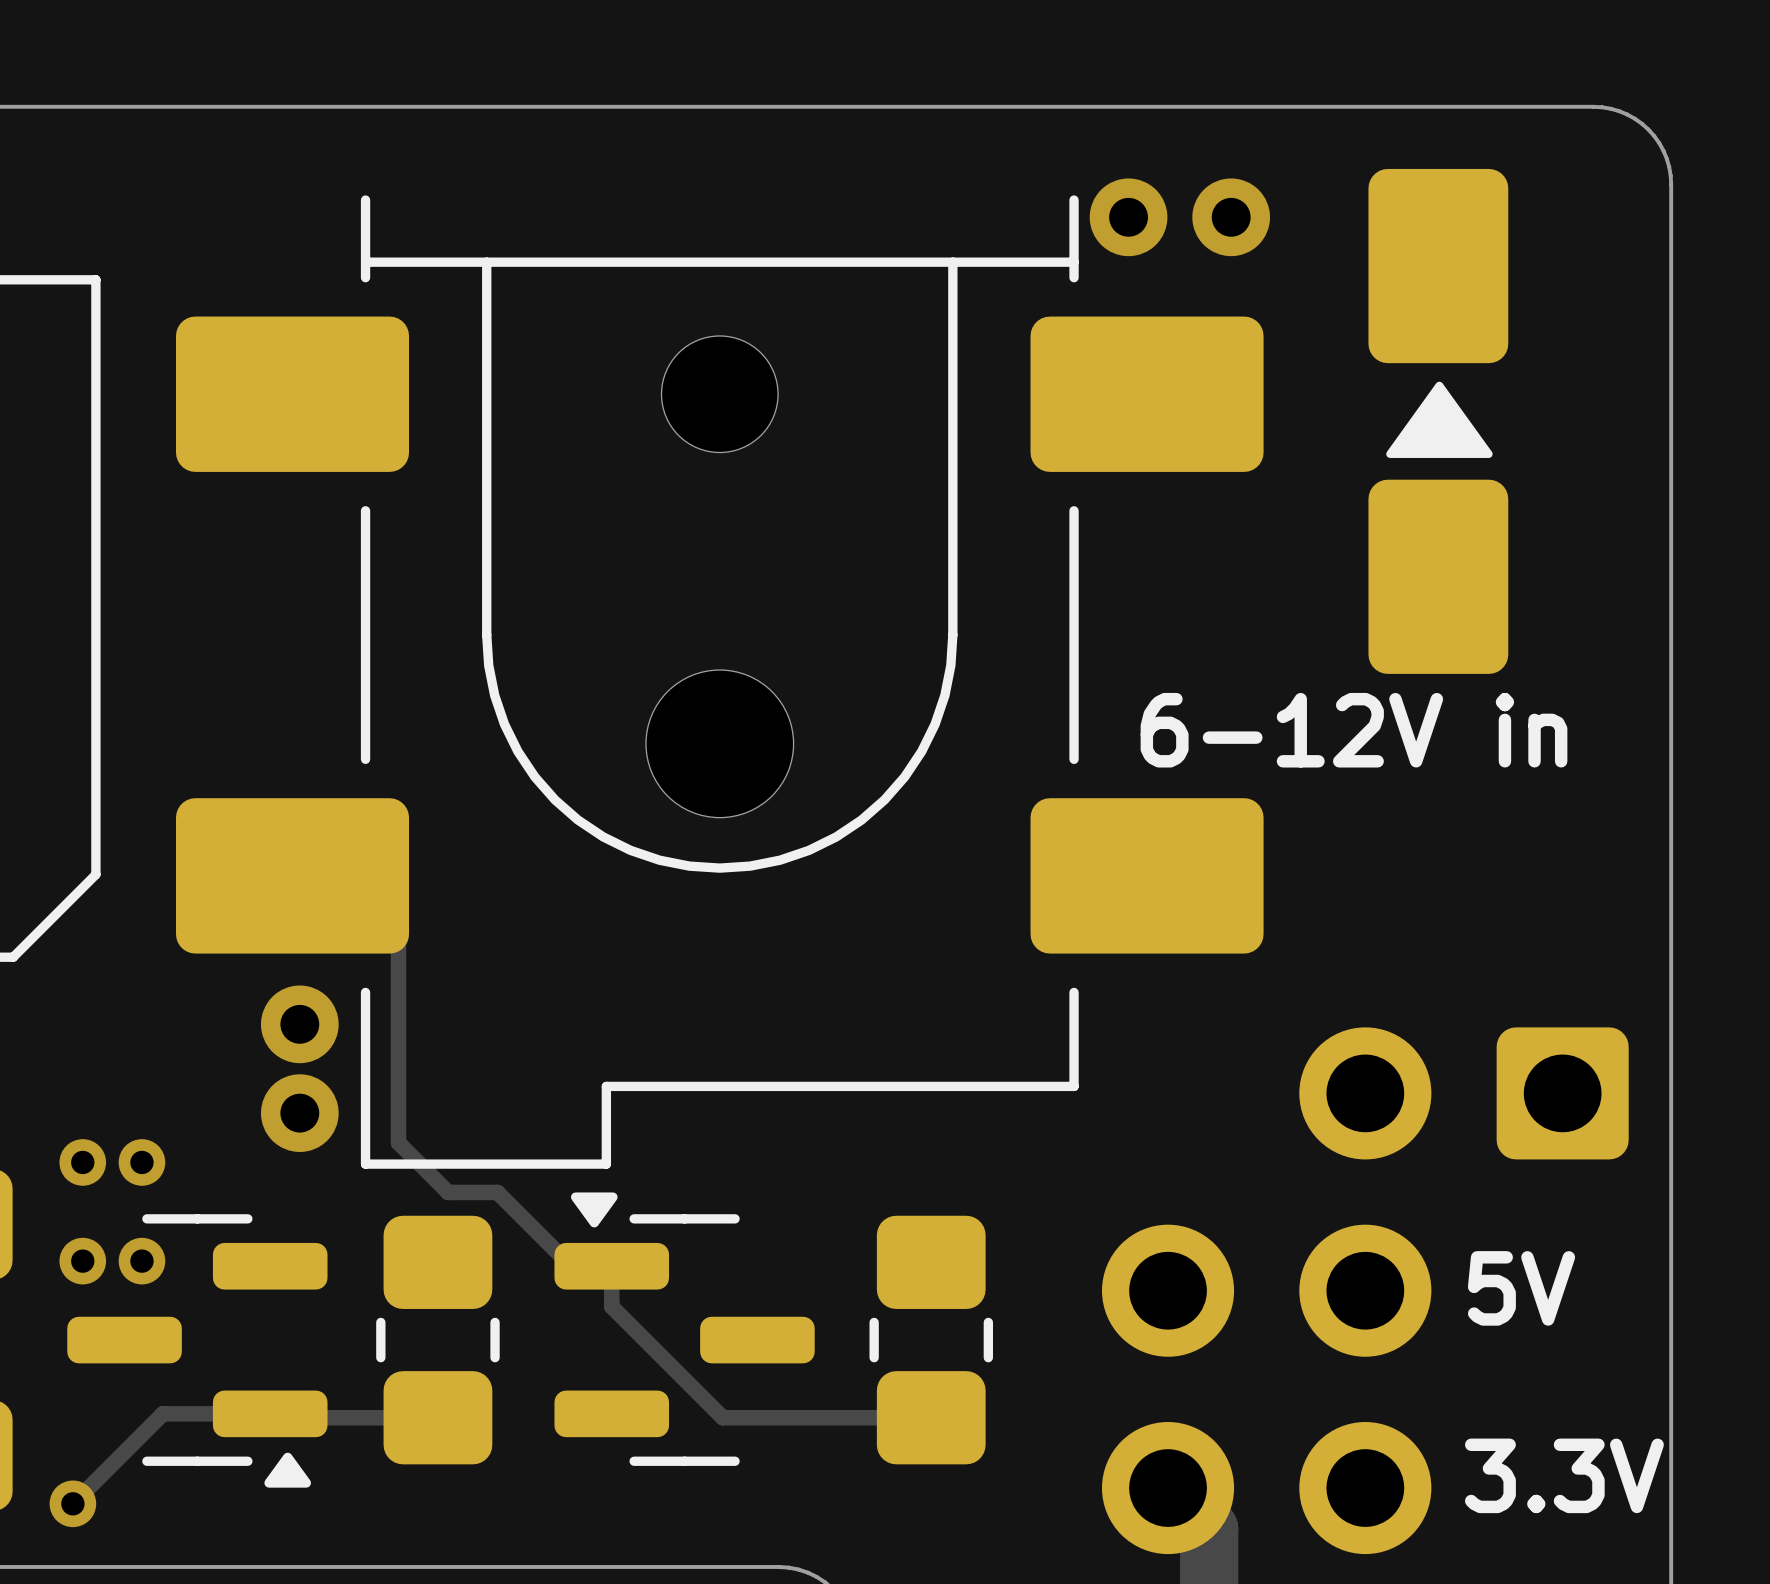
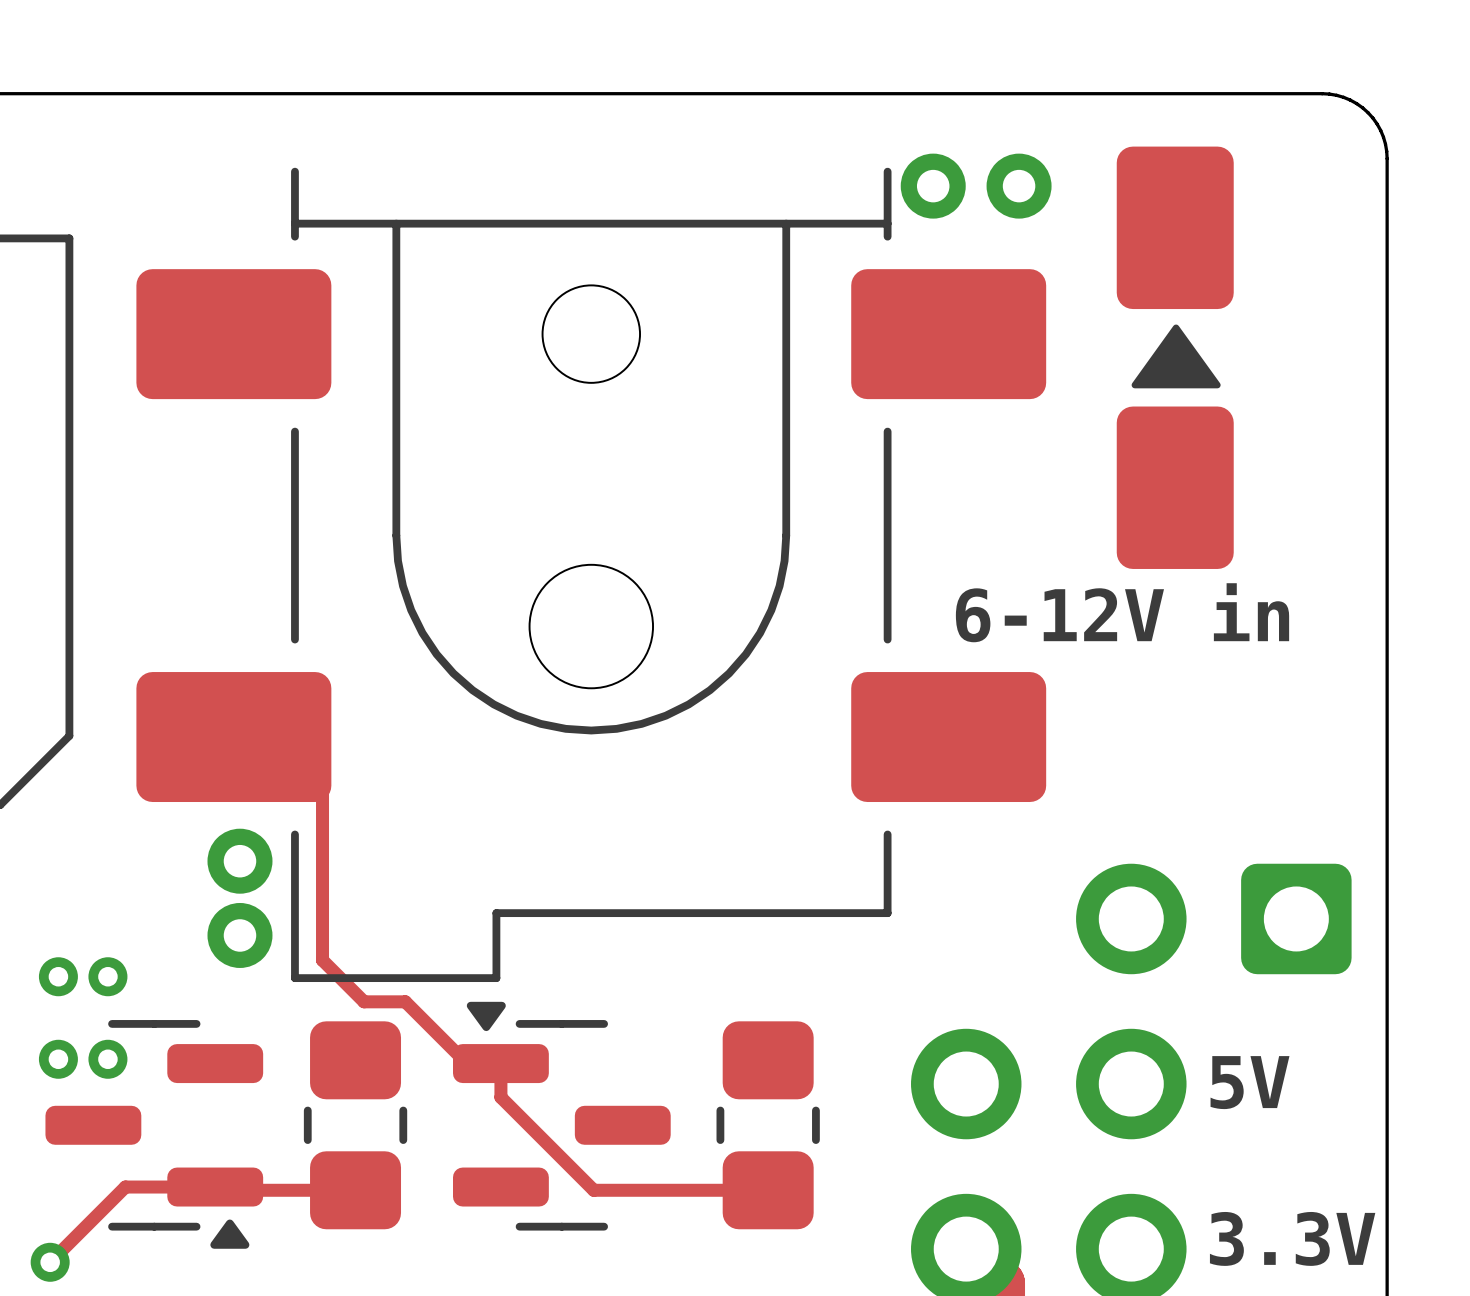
part position: (1438, 421) -> (1175, 357)

